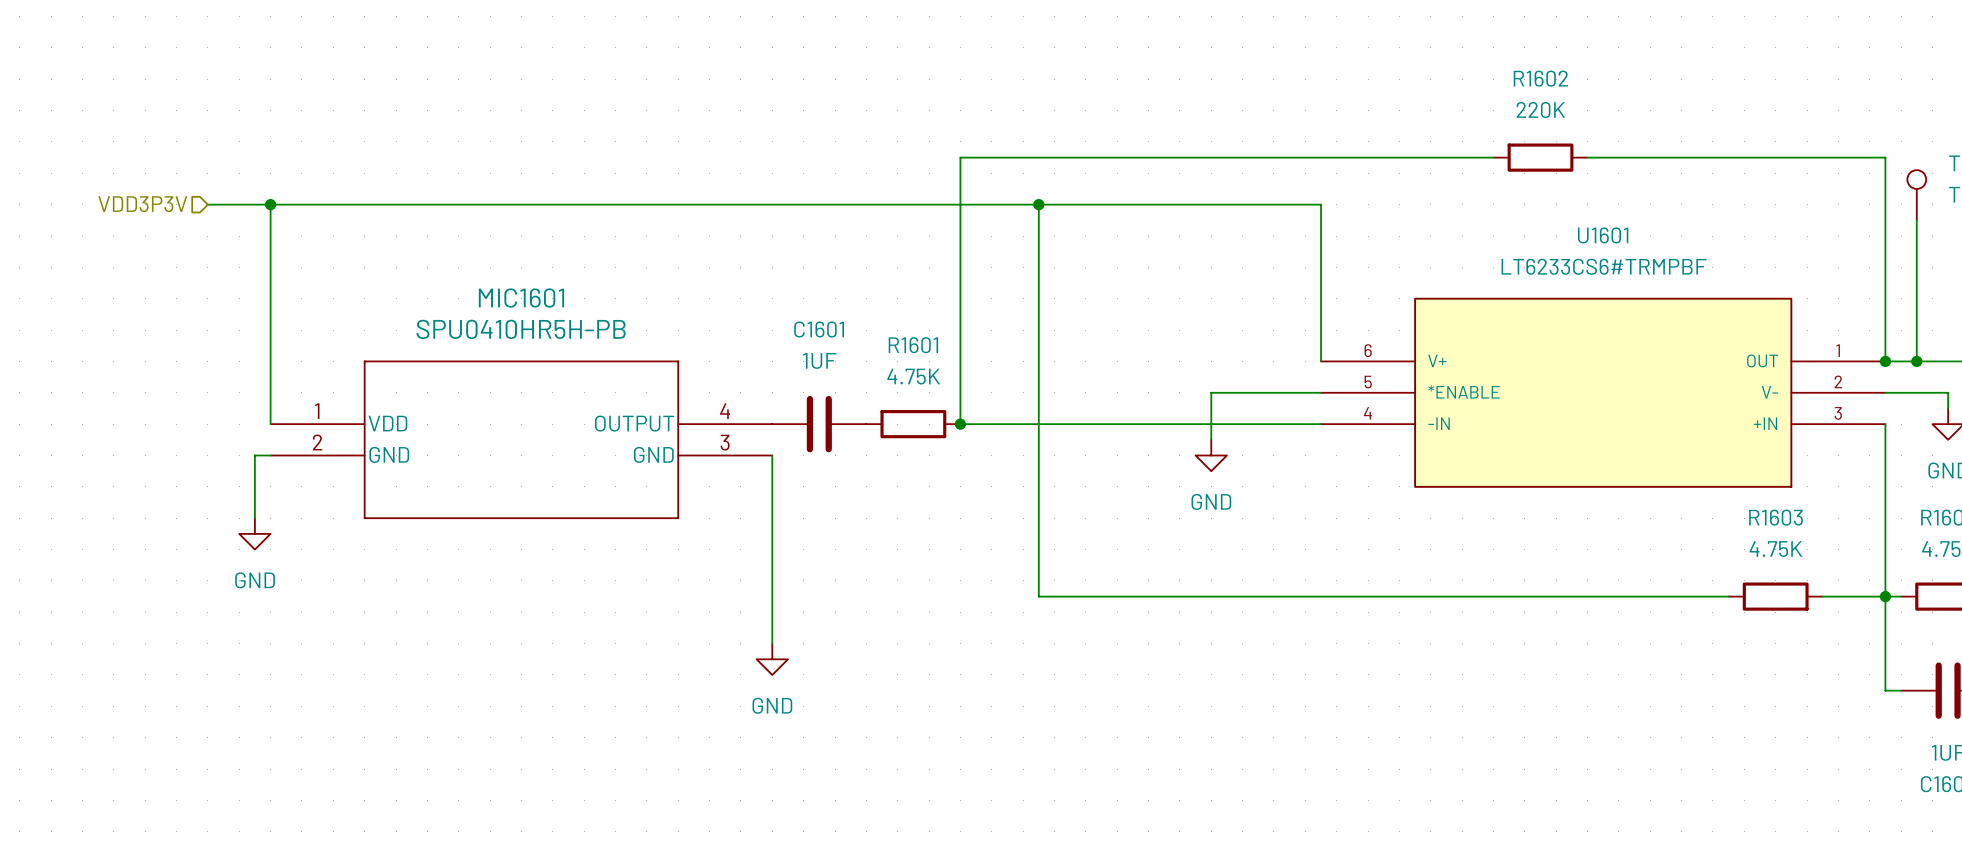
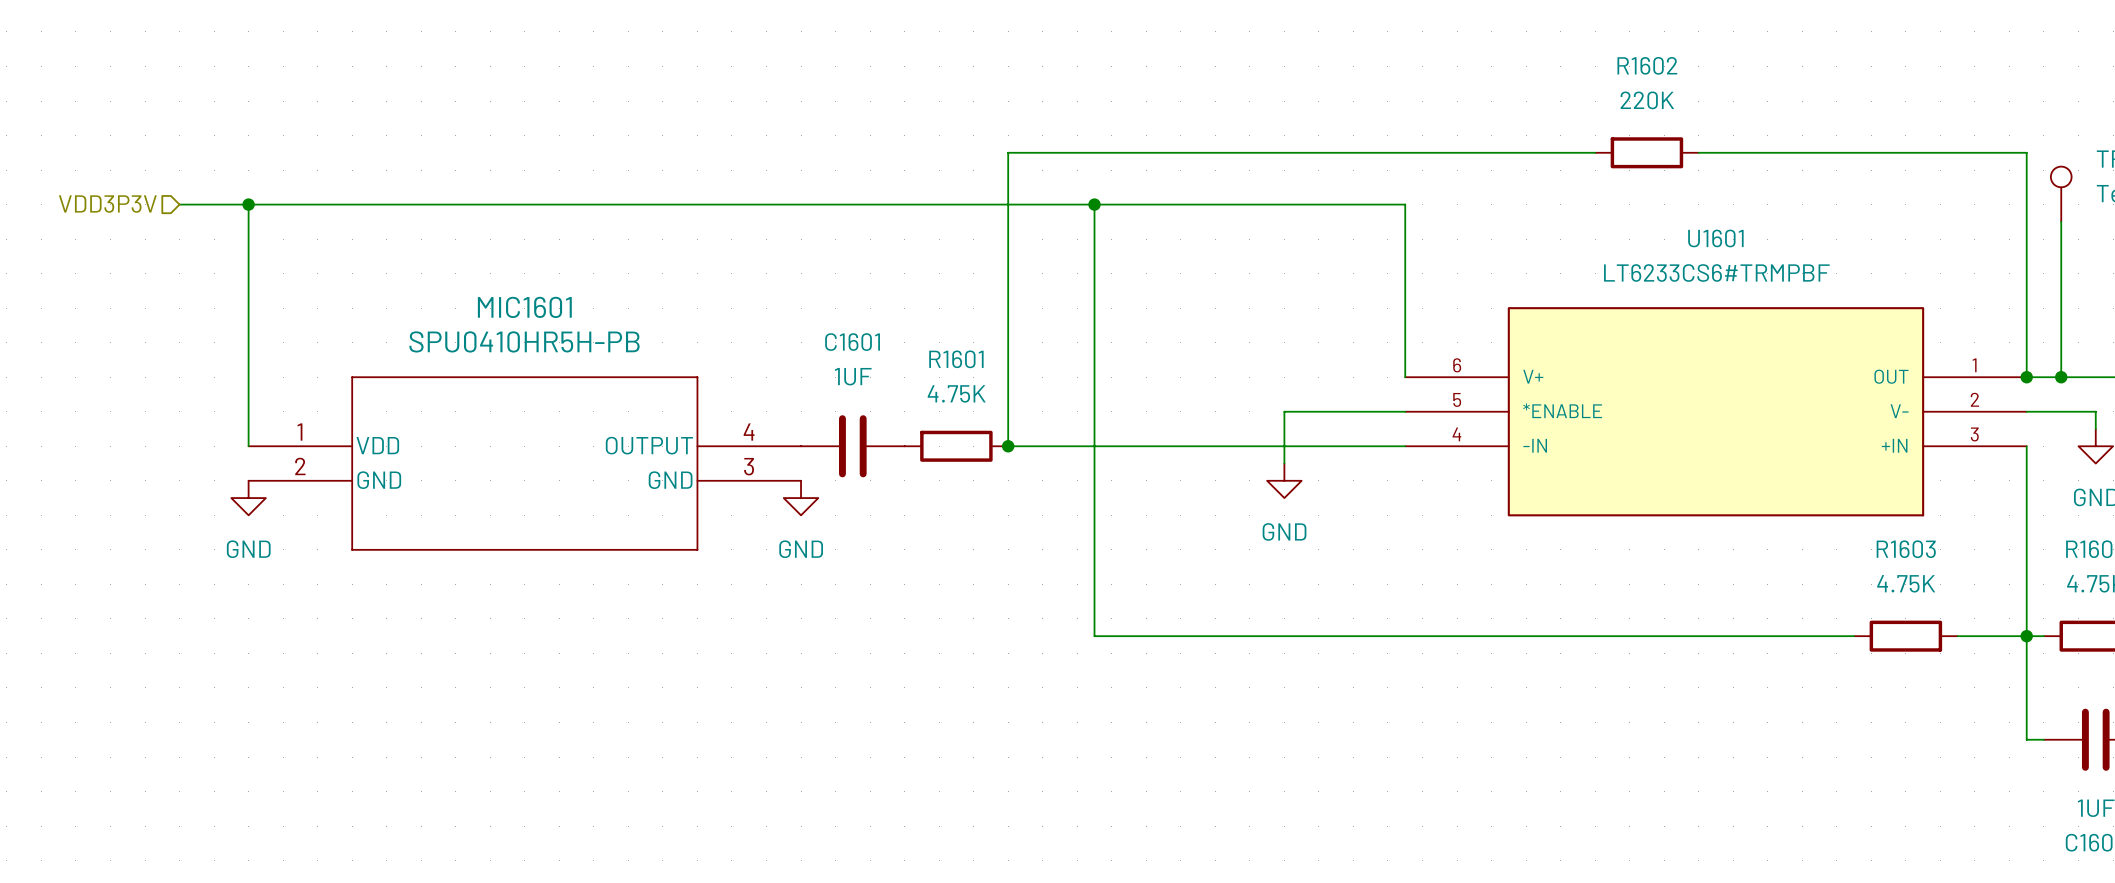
wire: (270, 455) (254, 455) (254, 518) -> none
wire: (772, 455) (772, 643) -> none
power symbol position: GND (254, 533) -> GND (248, 498)
power symbol position: GND (772, 659) -> GND (801, 498)

